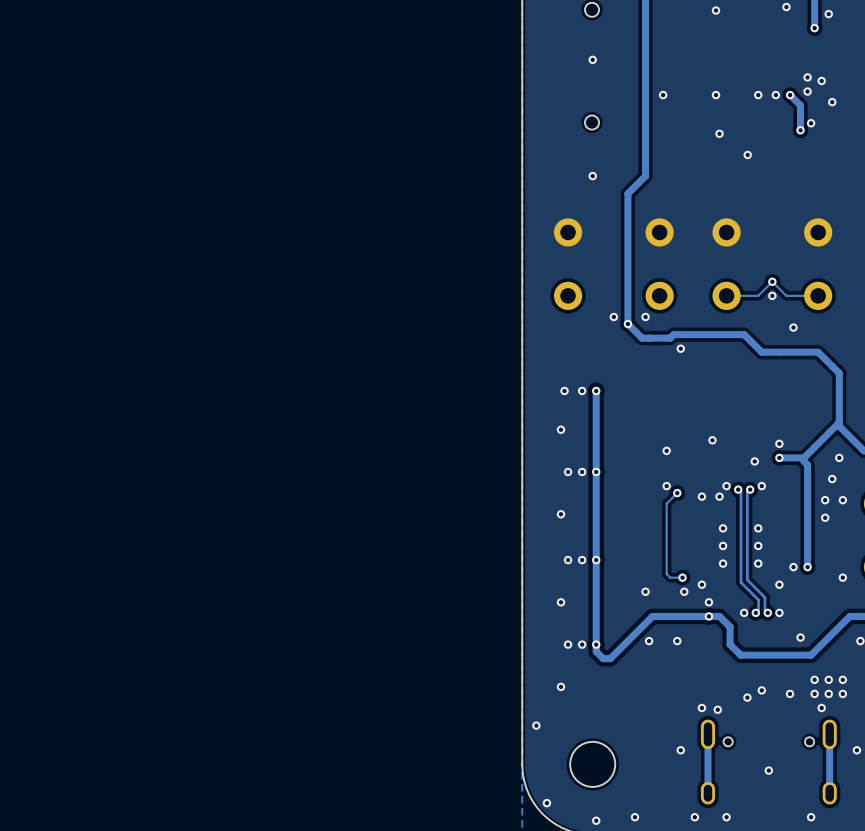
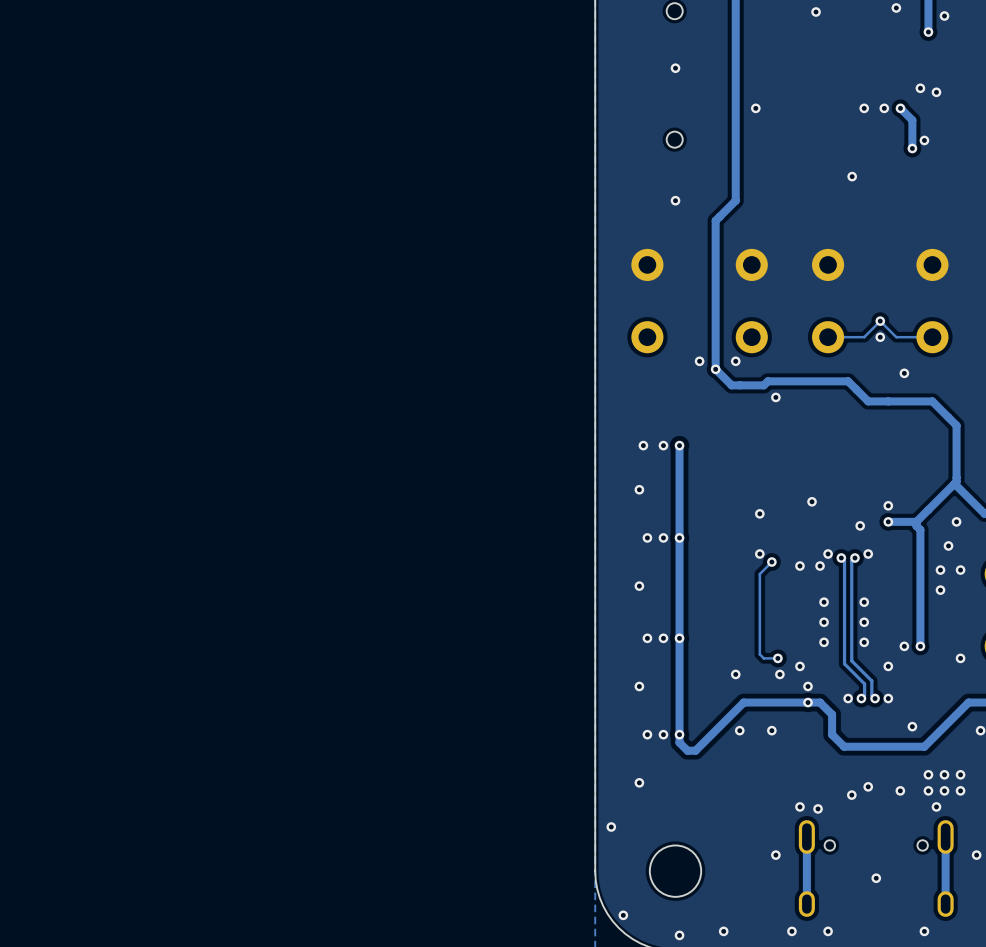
via: (807, 91) -> none
via: (716, 95) -> none
via: (832, 102) -> none
via: (719, 133) -> none

